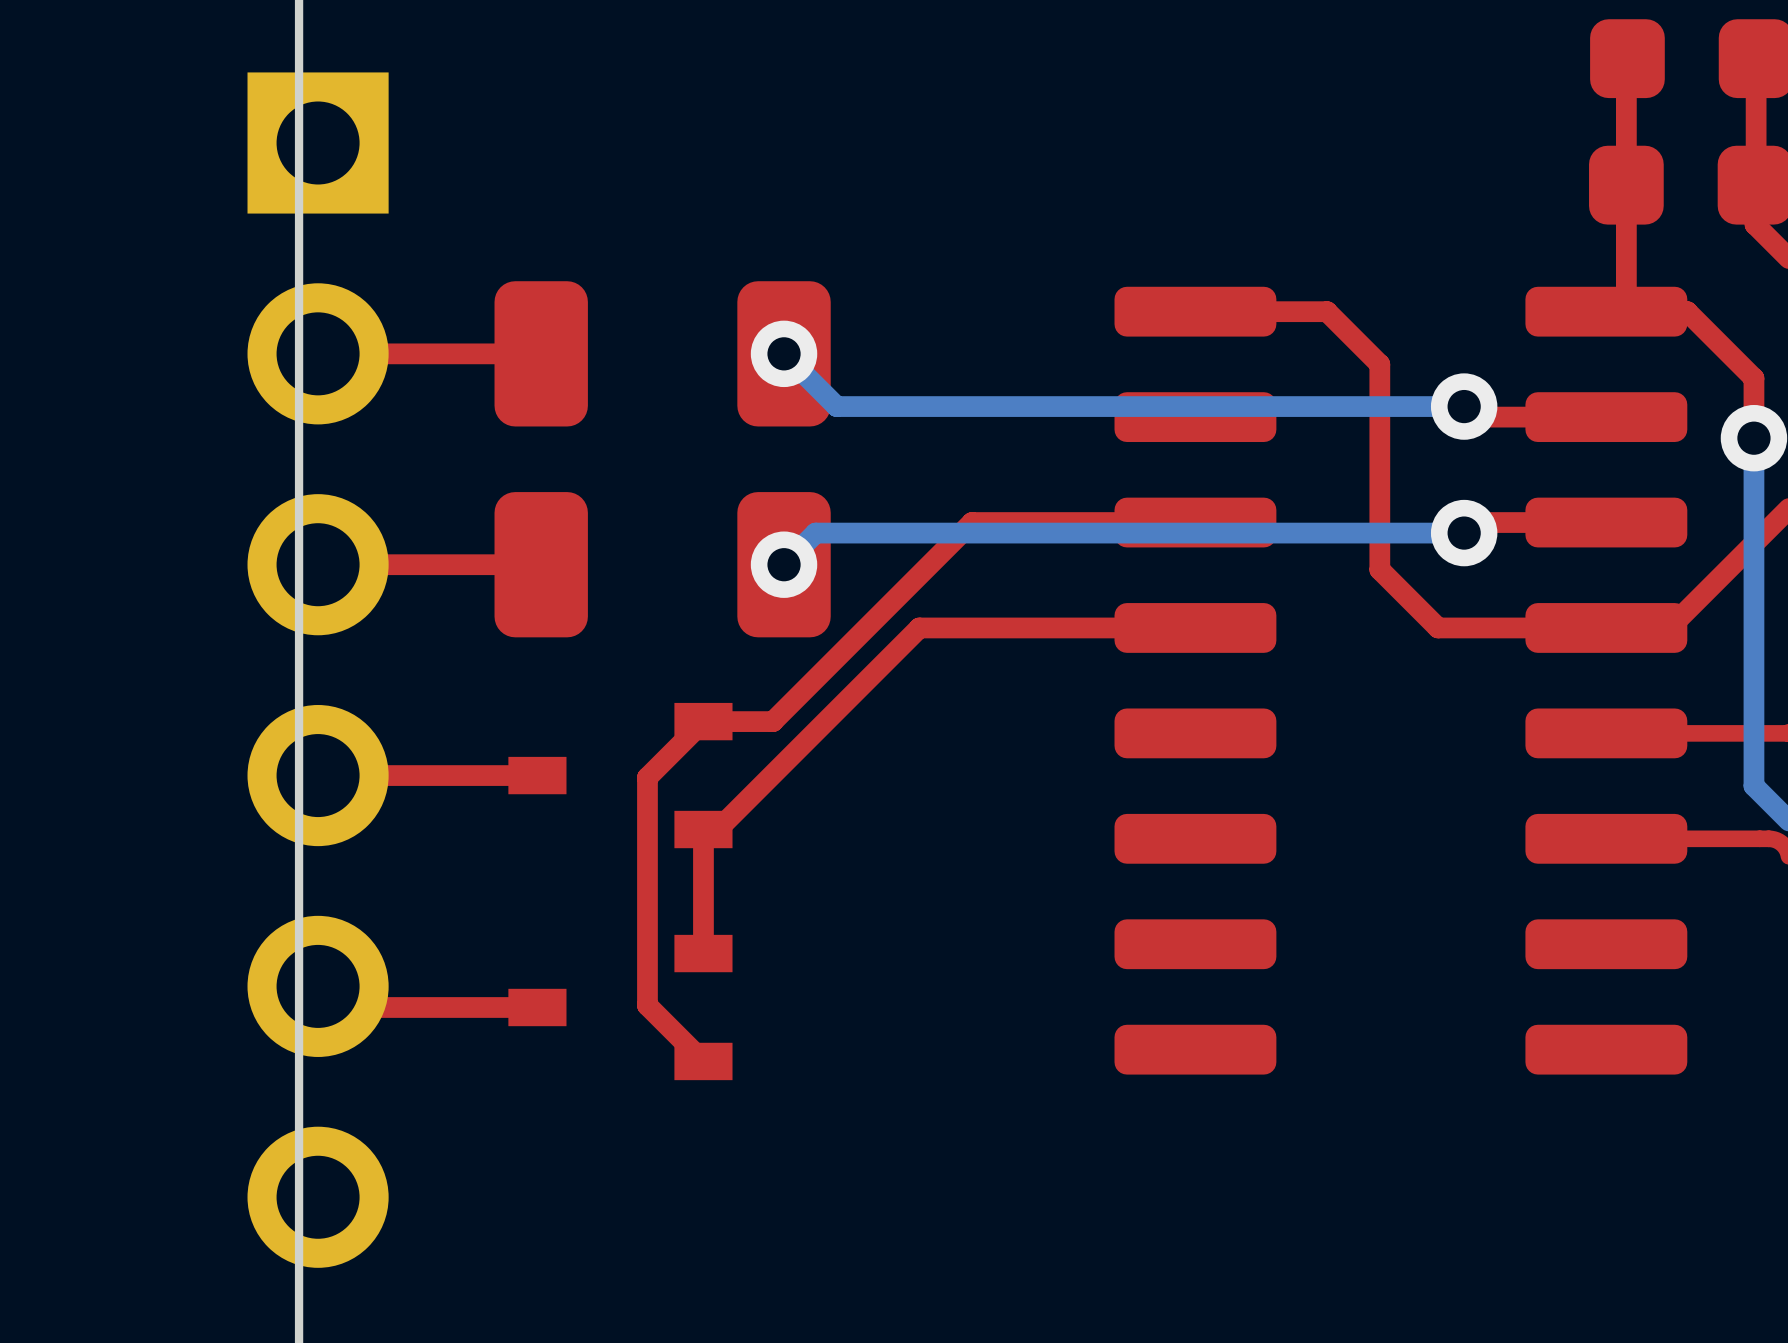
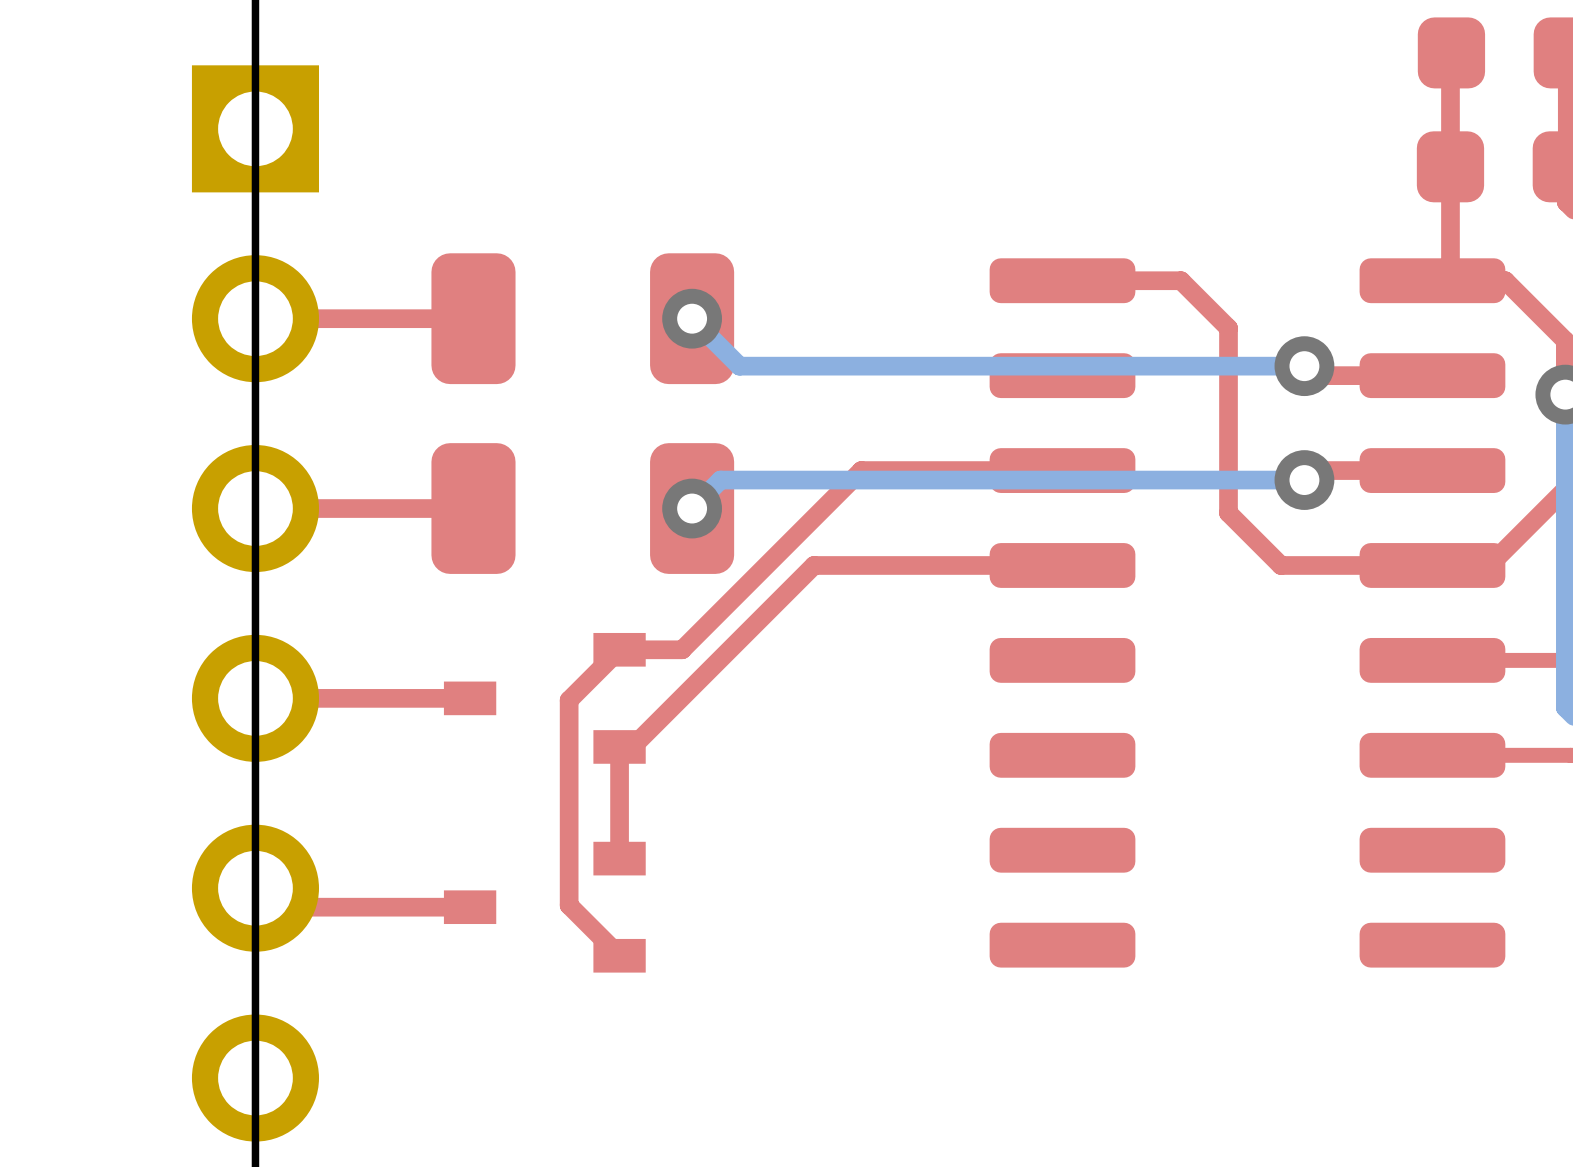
part position: (318, 670) -> (255, 603)

